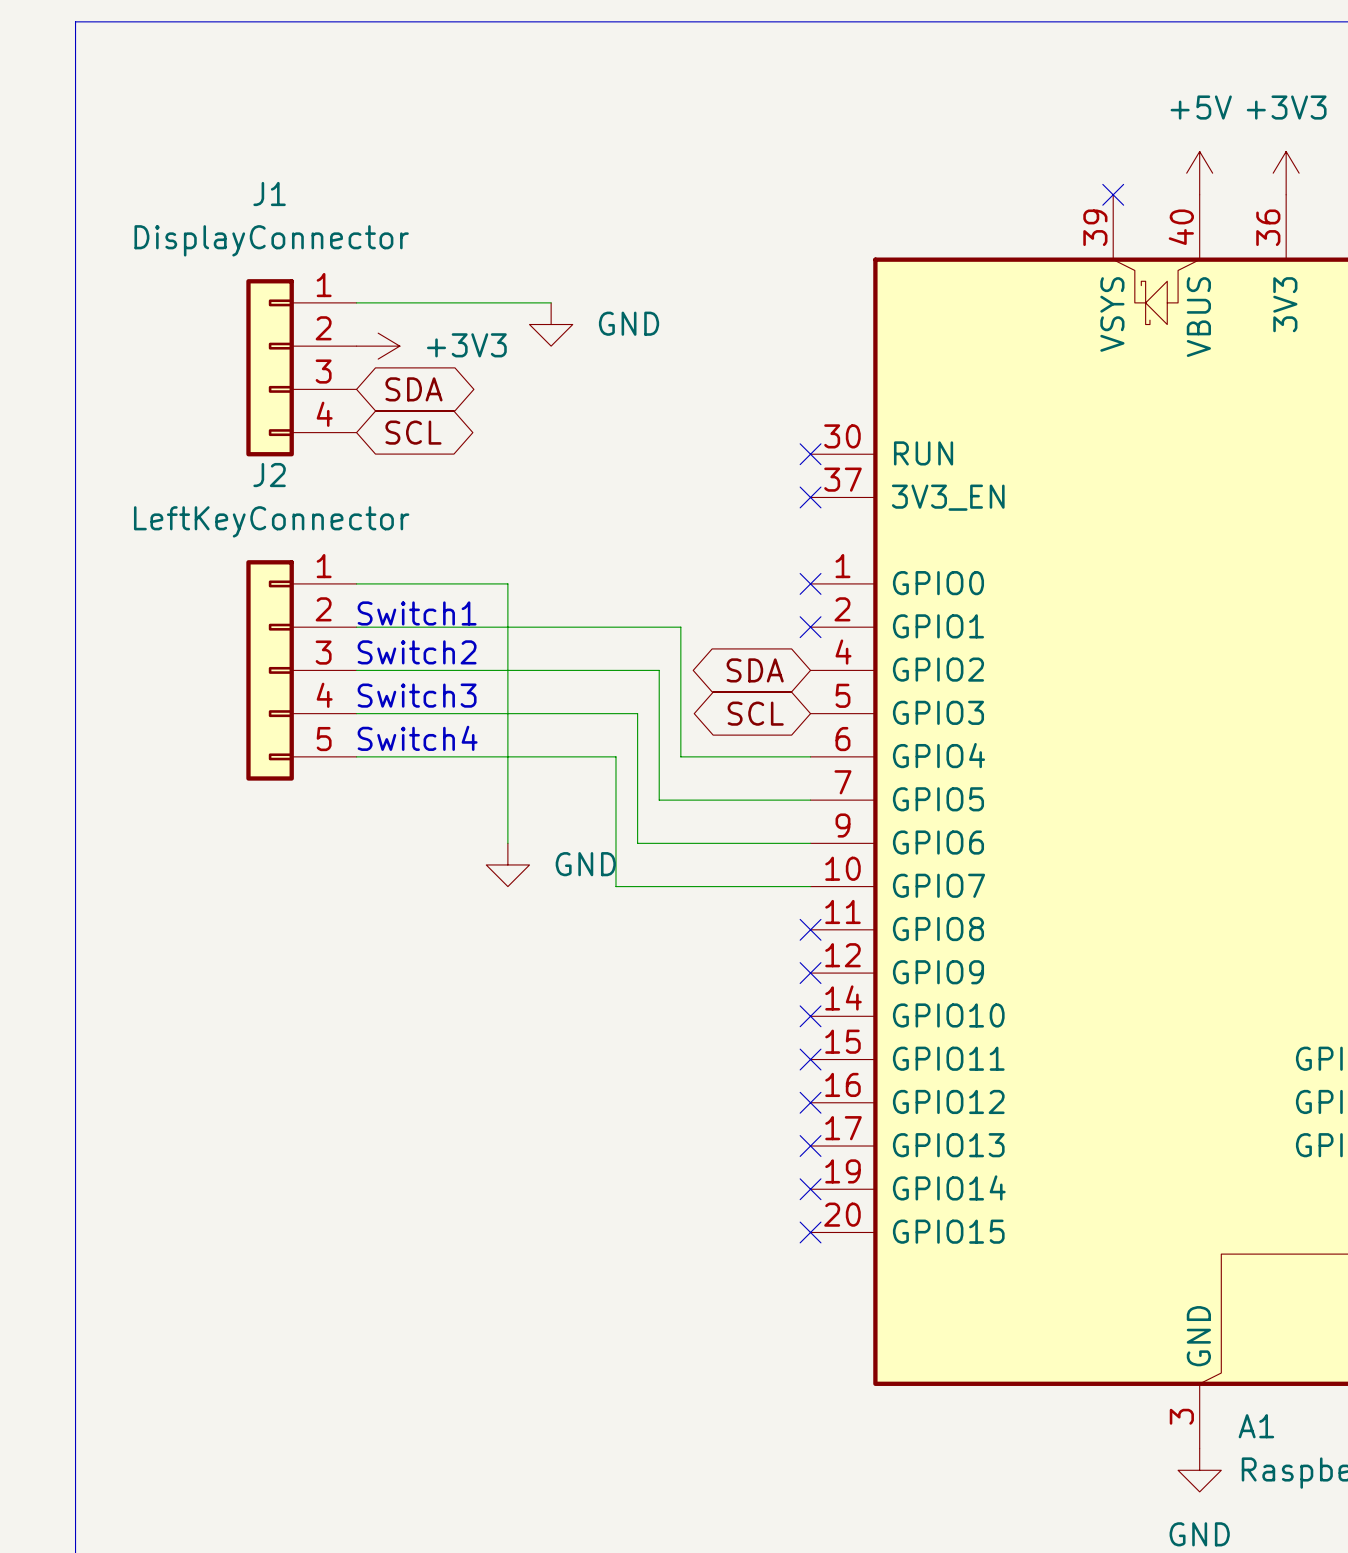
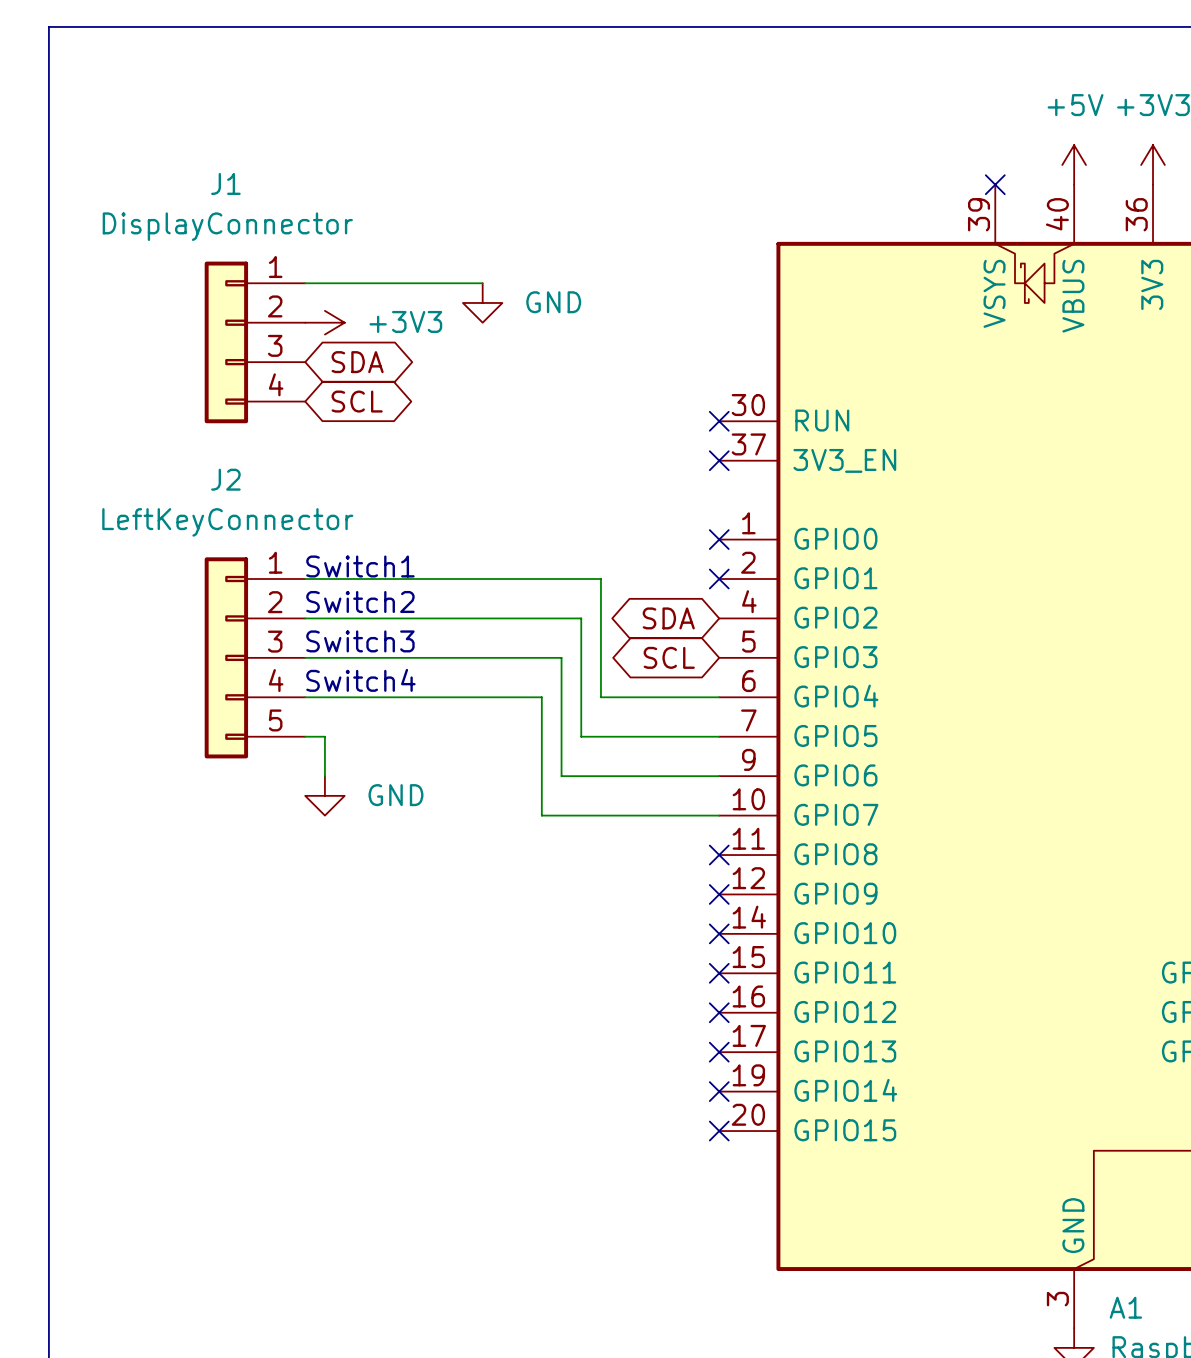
wire: (356, 583) (507, 583) (507, 843) -> none
J2 position: (301, 670) -> (254, 657)
wire: none -> (305, 736) (324, 736) (324, 776)
power symbol position: GND (507, 864) -> GND (324, 795)

